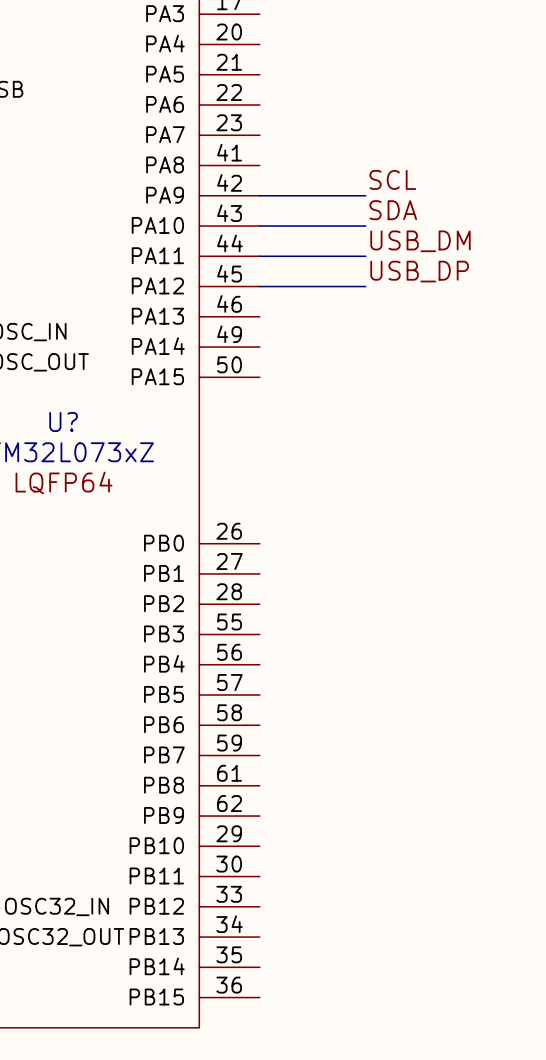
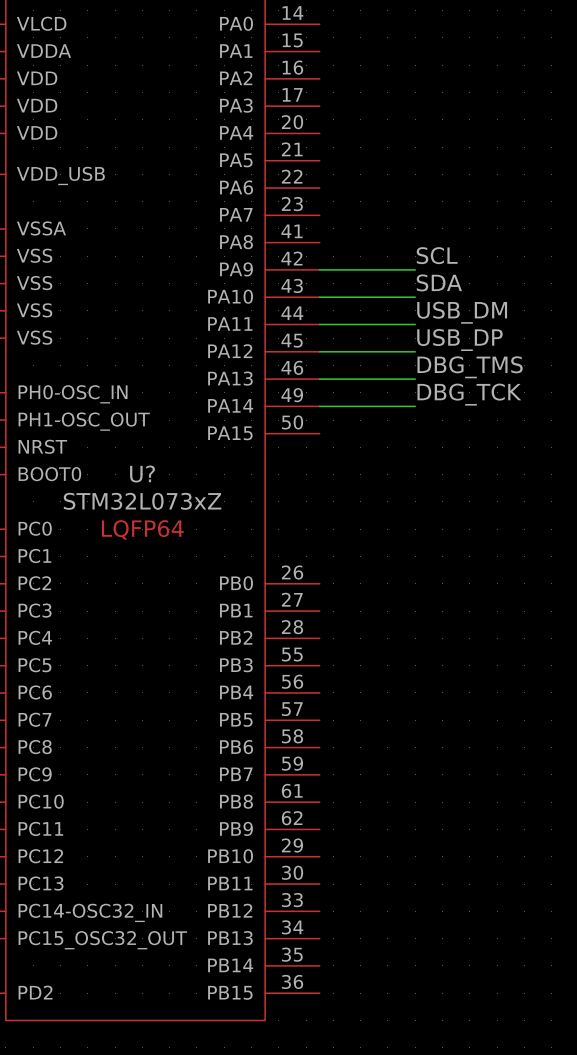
label: none -> DBG_TMS (470, 367)
wire: none -> (319, 379) (415, 379)
label: none -> DBG_TCK (469, 394)
wire: none -> (319, 406) (415, 406)

